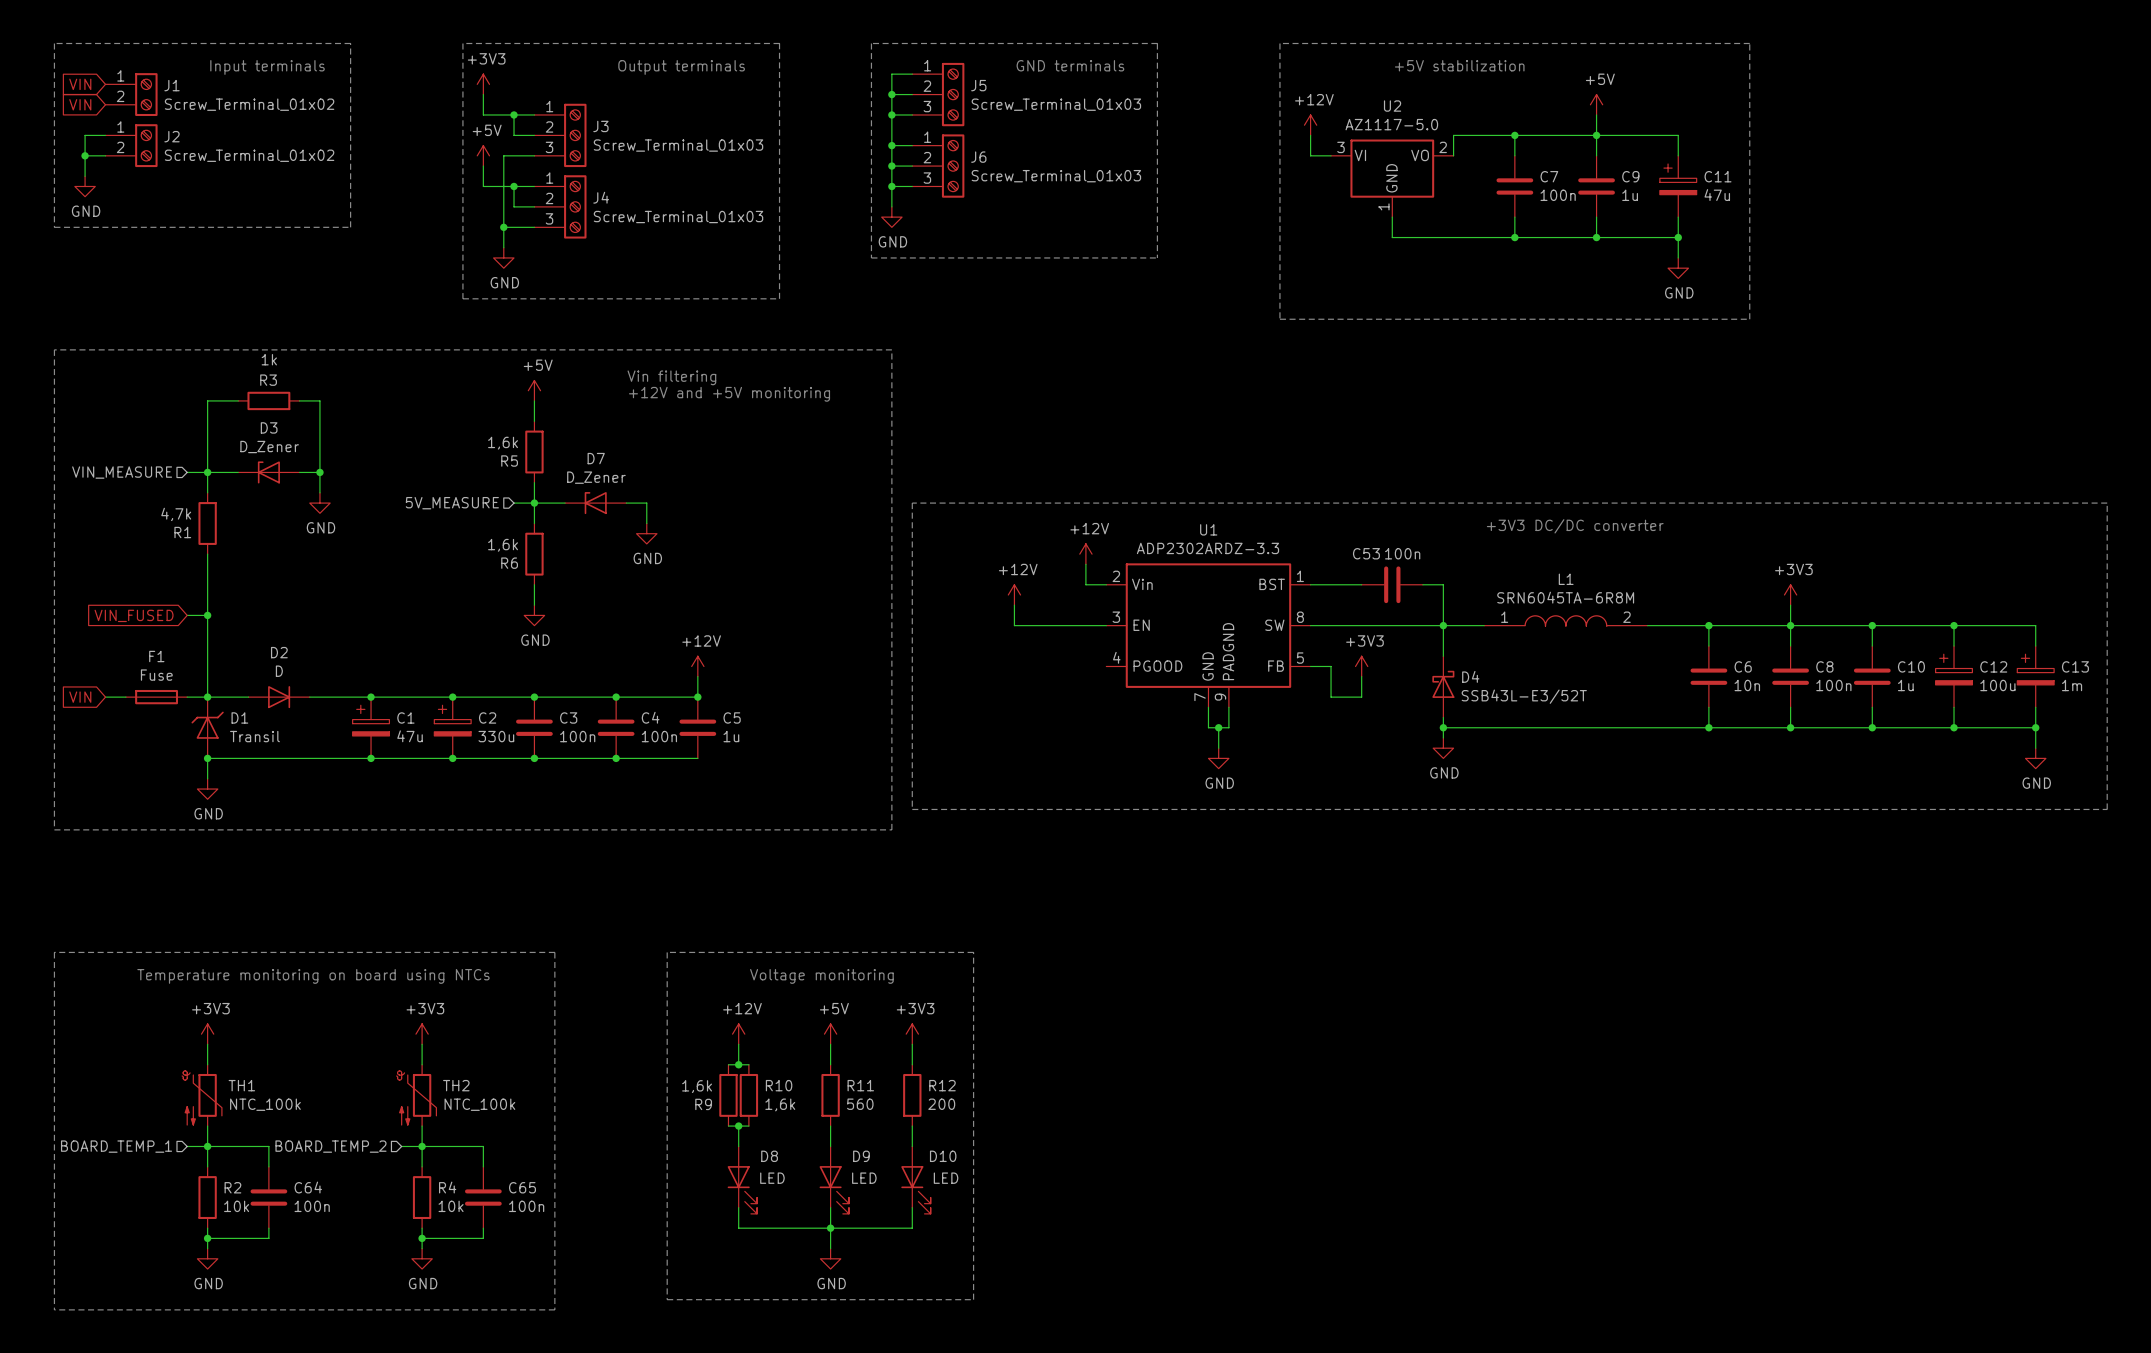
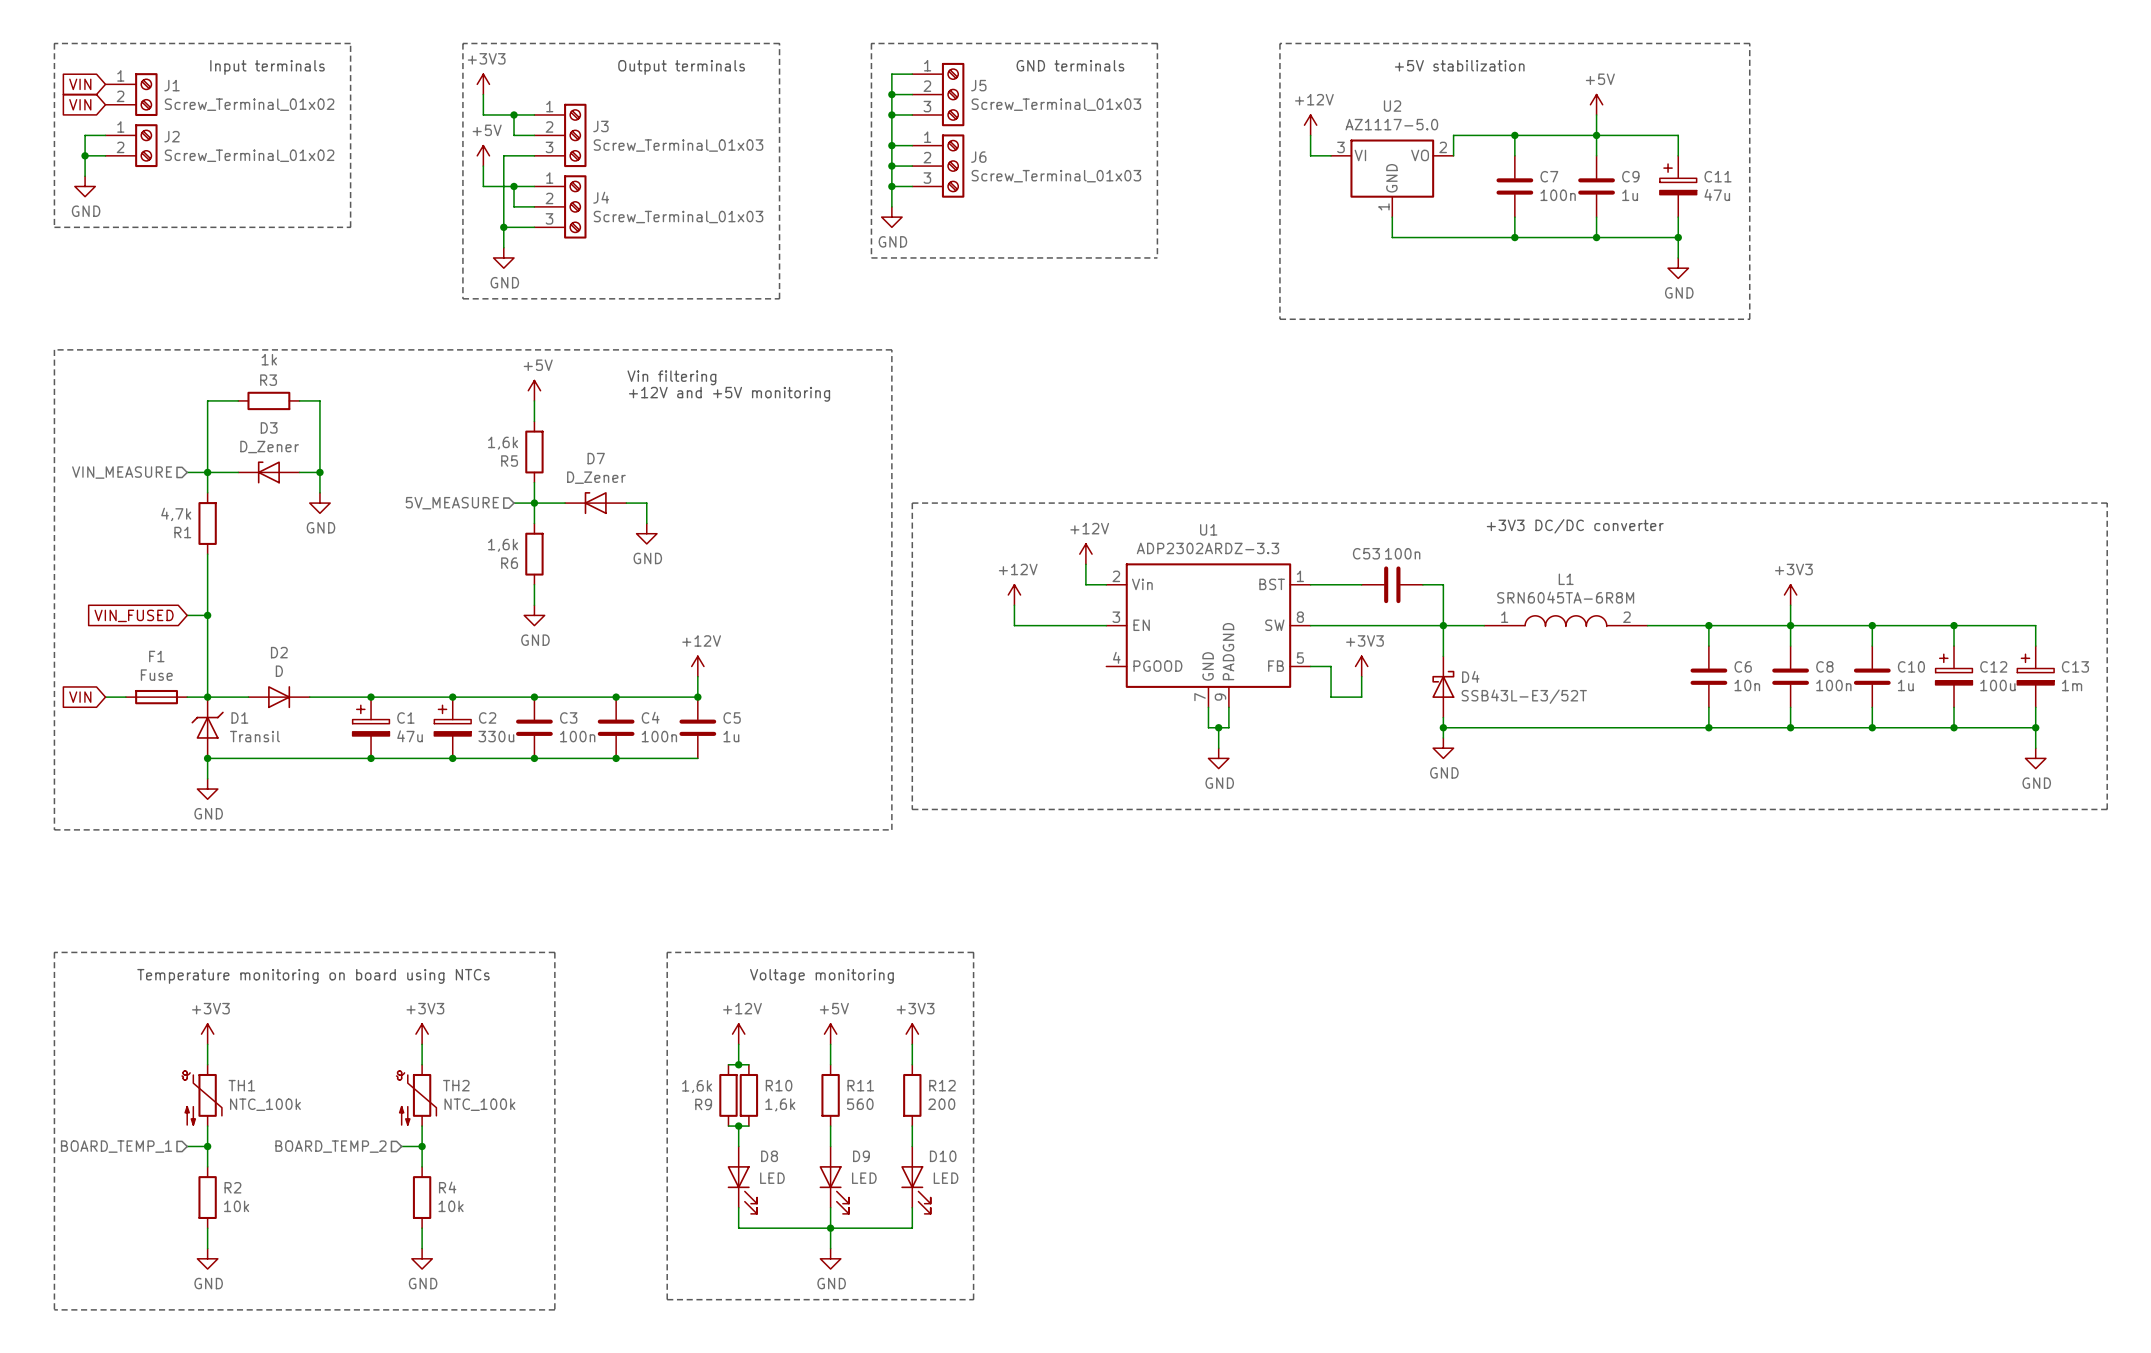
wire: (207, 1146) (268, 1146) (268, 1166) -> none
wire: (422, 1146) (483, 1146) (483, 1166) -> none
C64: 100n (268, 1197) -> none
C65: 100n (483, 1197) -> none
wire: (268, 1228) (268, 1238) (207, 1238) -> none
wire: (483, 1228) (483, 1238) (422, 1238) -> none
junction: (207, 1238) -> none
junction: (422, 1238) -> none

